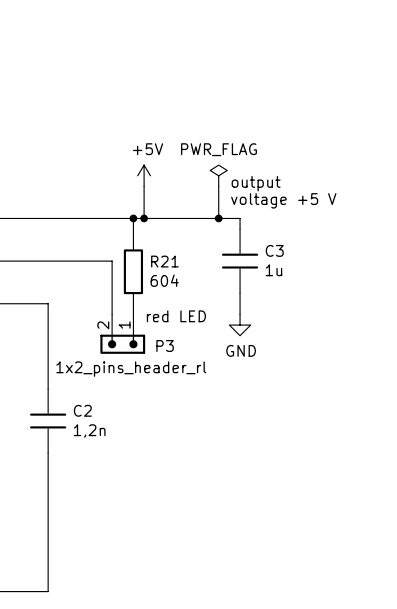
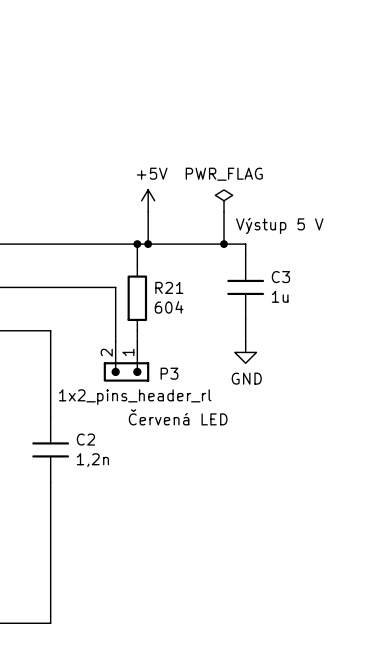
text: output (256, 183) -> none
text: voltage +5 V (283, 200) -> Výstup 5 V (279, 225)
text: red LED (176, 316) -> none
text: none -> Červená LED (178, 417)

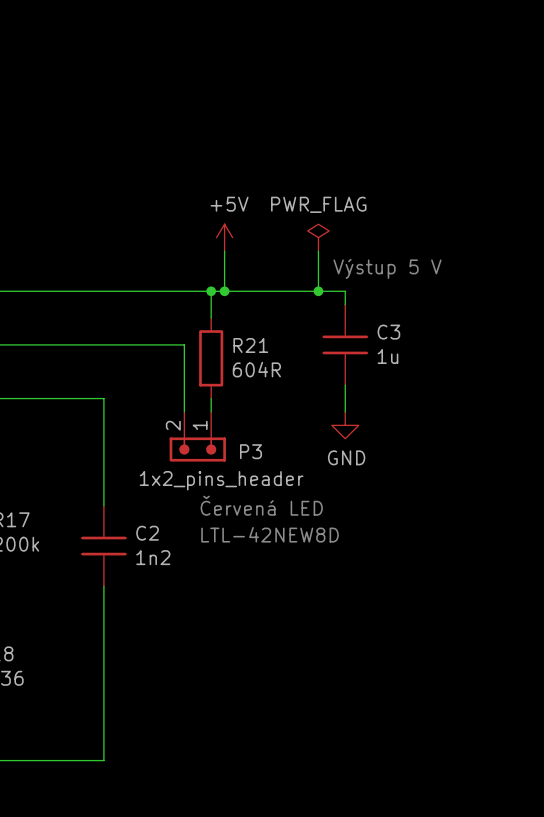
R21 value: 604 (169, 307) -> 604R (256, 369)
P3 value: 1x2_pins_header_rl (135, 397) -> 1x2_pins_header (221, 480)
text: none -> LTL-42NEW8D (270, 534)
C2 value: 1,2n (92, 460) -> 1n2 (153, 557)

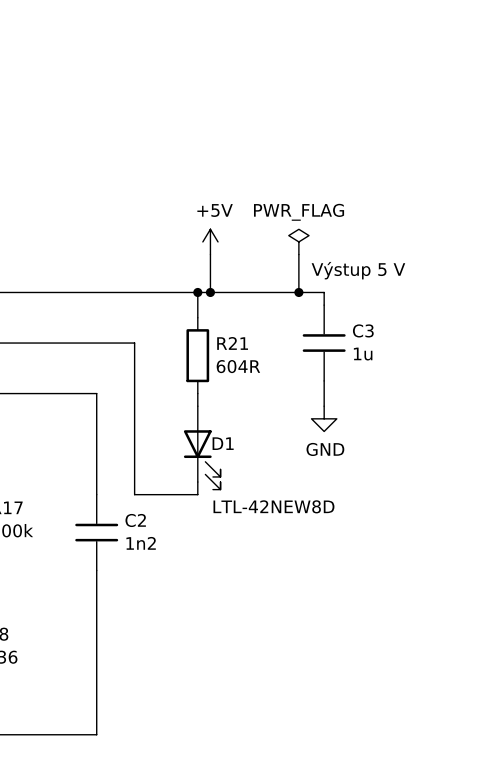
wire: (144, 344) (184, 344) (184, 411) -> (134, 343) (134, 494) (197, 494) (197, 482)
P3: 1x2_pins_header (197, 436) -> none
D1: none -> LTL-42NEW8D (202, 447)
text: Červená LED (261, 505) -> none
text: LTL-42NEW8D (270, 534) -> none

